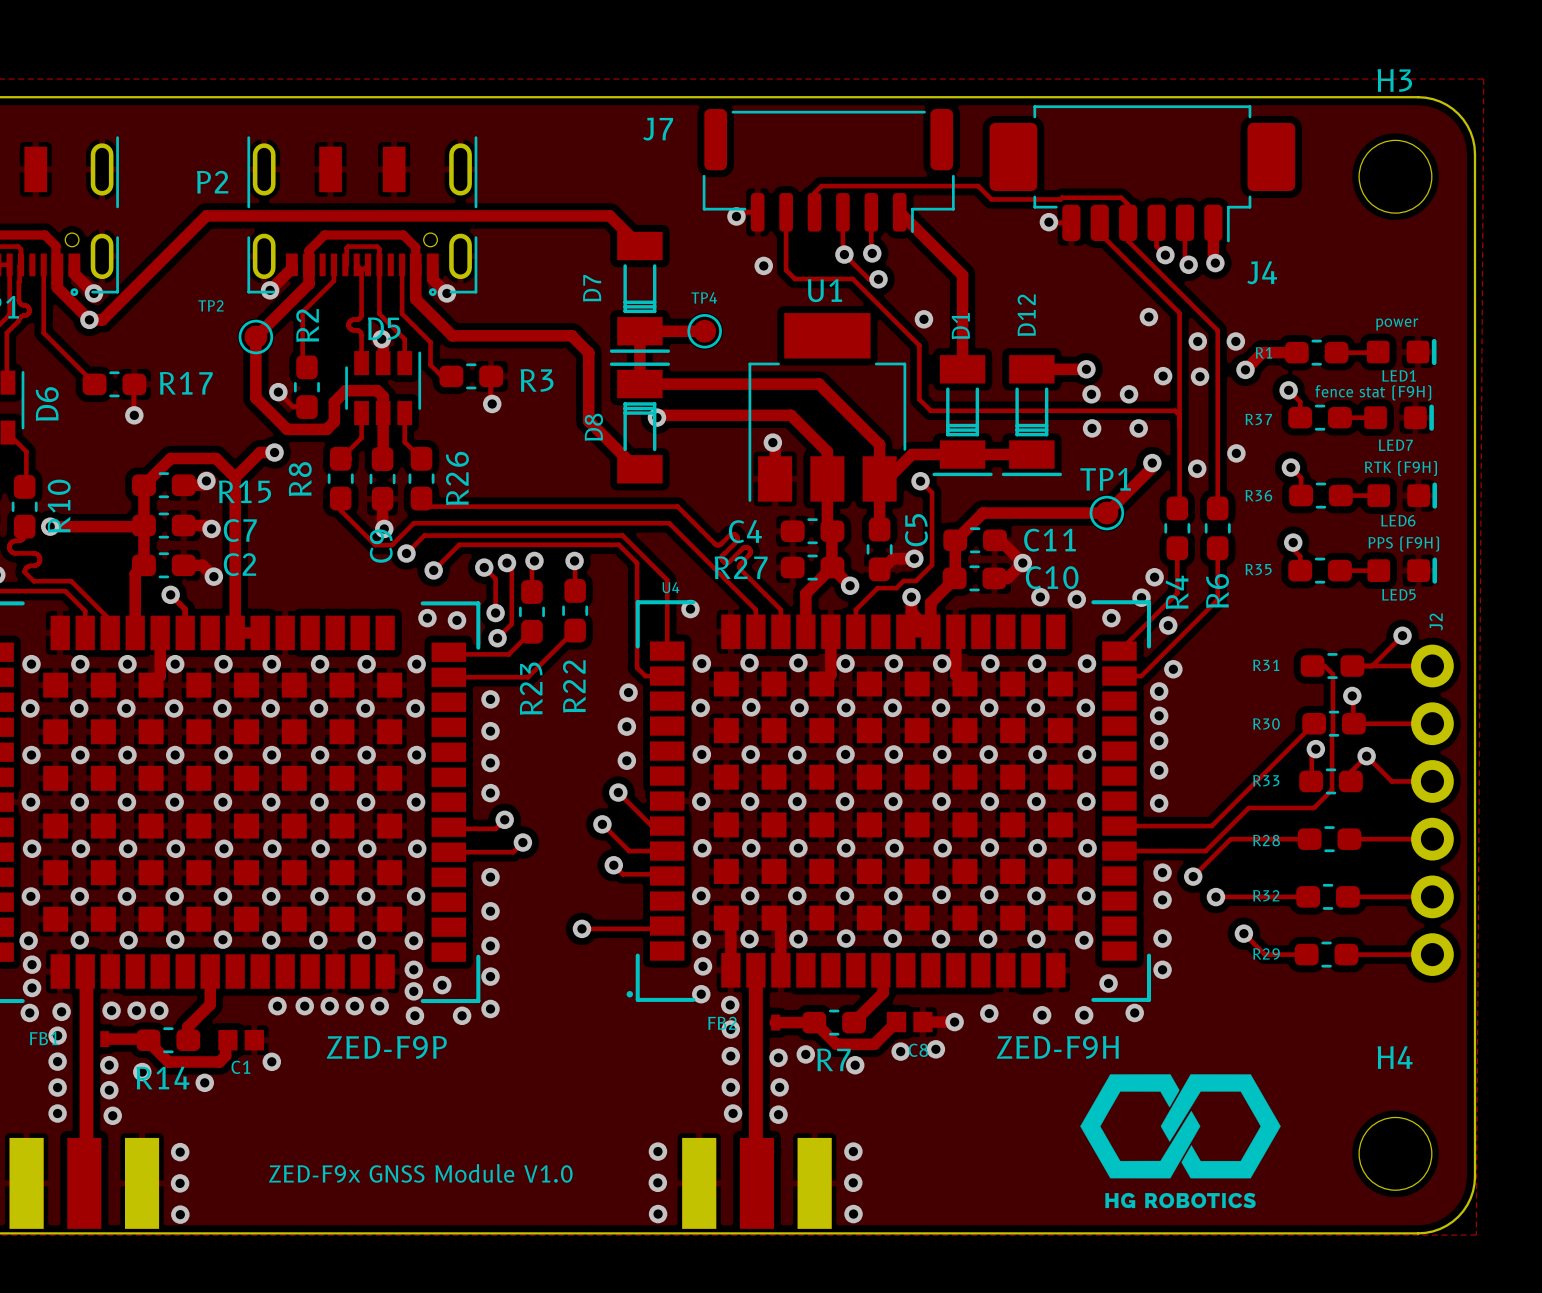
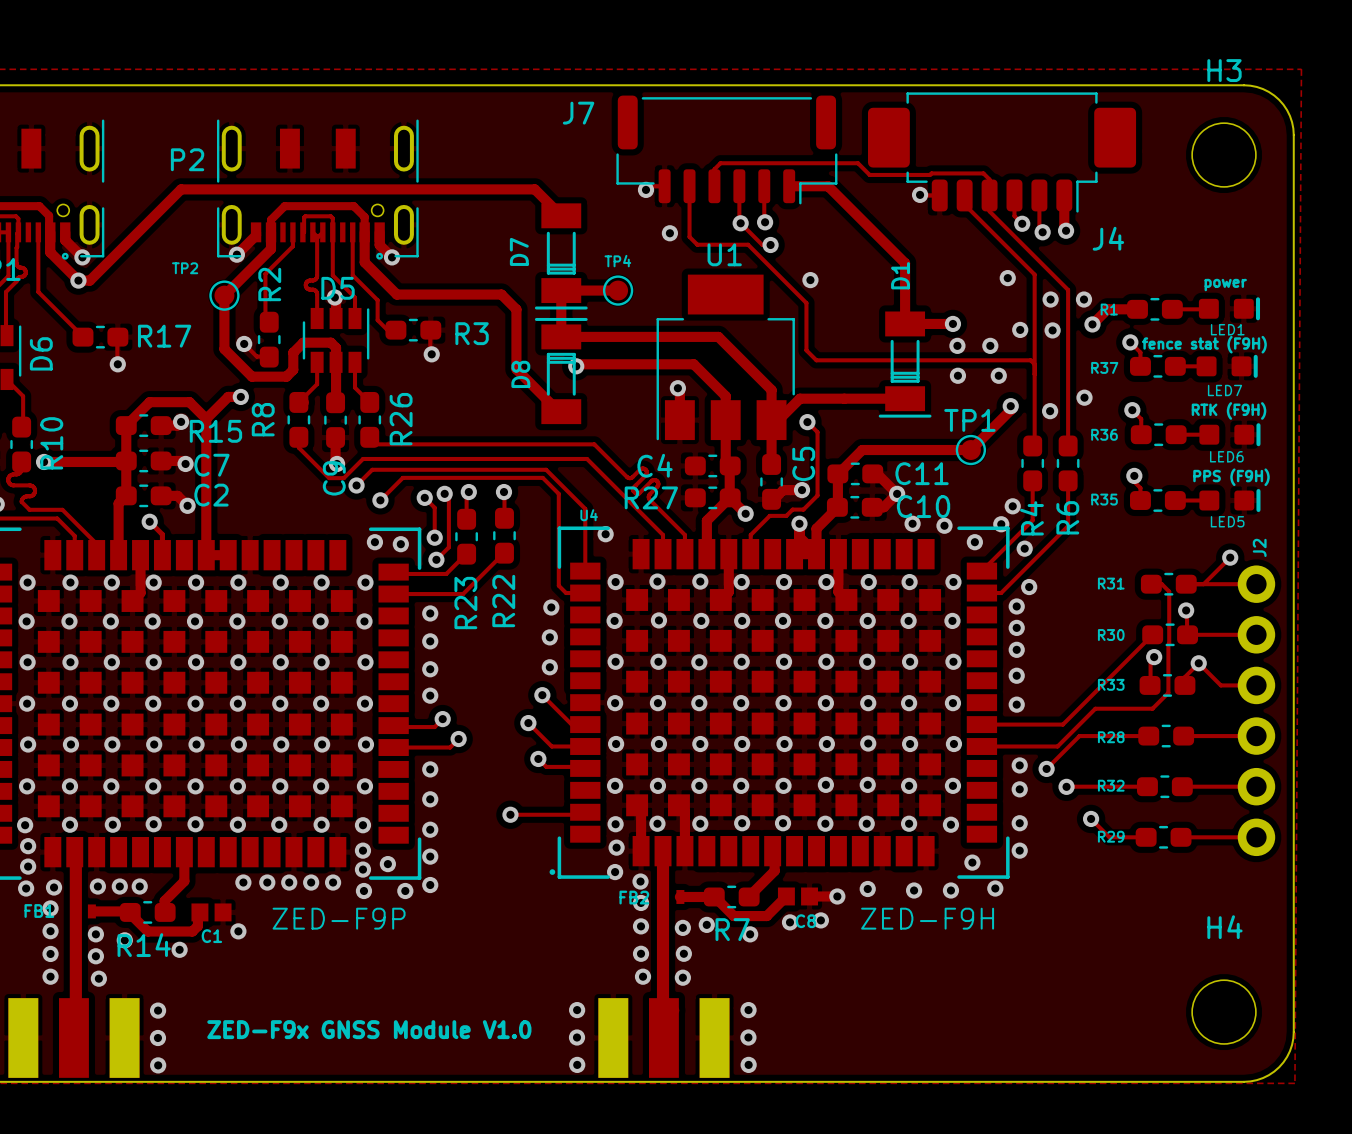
track: (899, 212) (962, 275) (962, 369) -> (789, 186) (828, 186) (905, 263) (905, 323)
D12 name: D12 (1026, 315) -> D1 (900, 275)
D1: (962, 415) -> none
drawing: [1080, 1074, 1281, 1209] -> none

